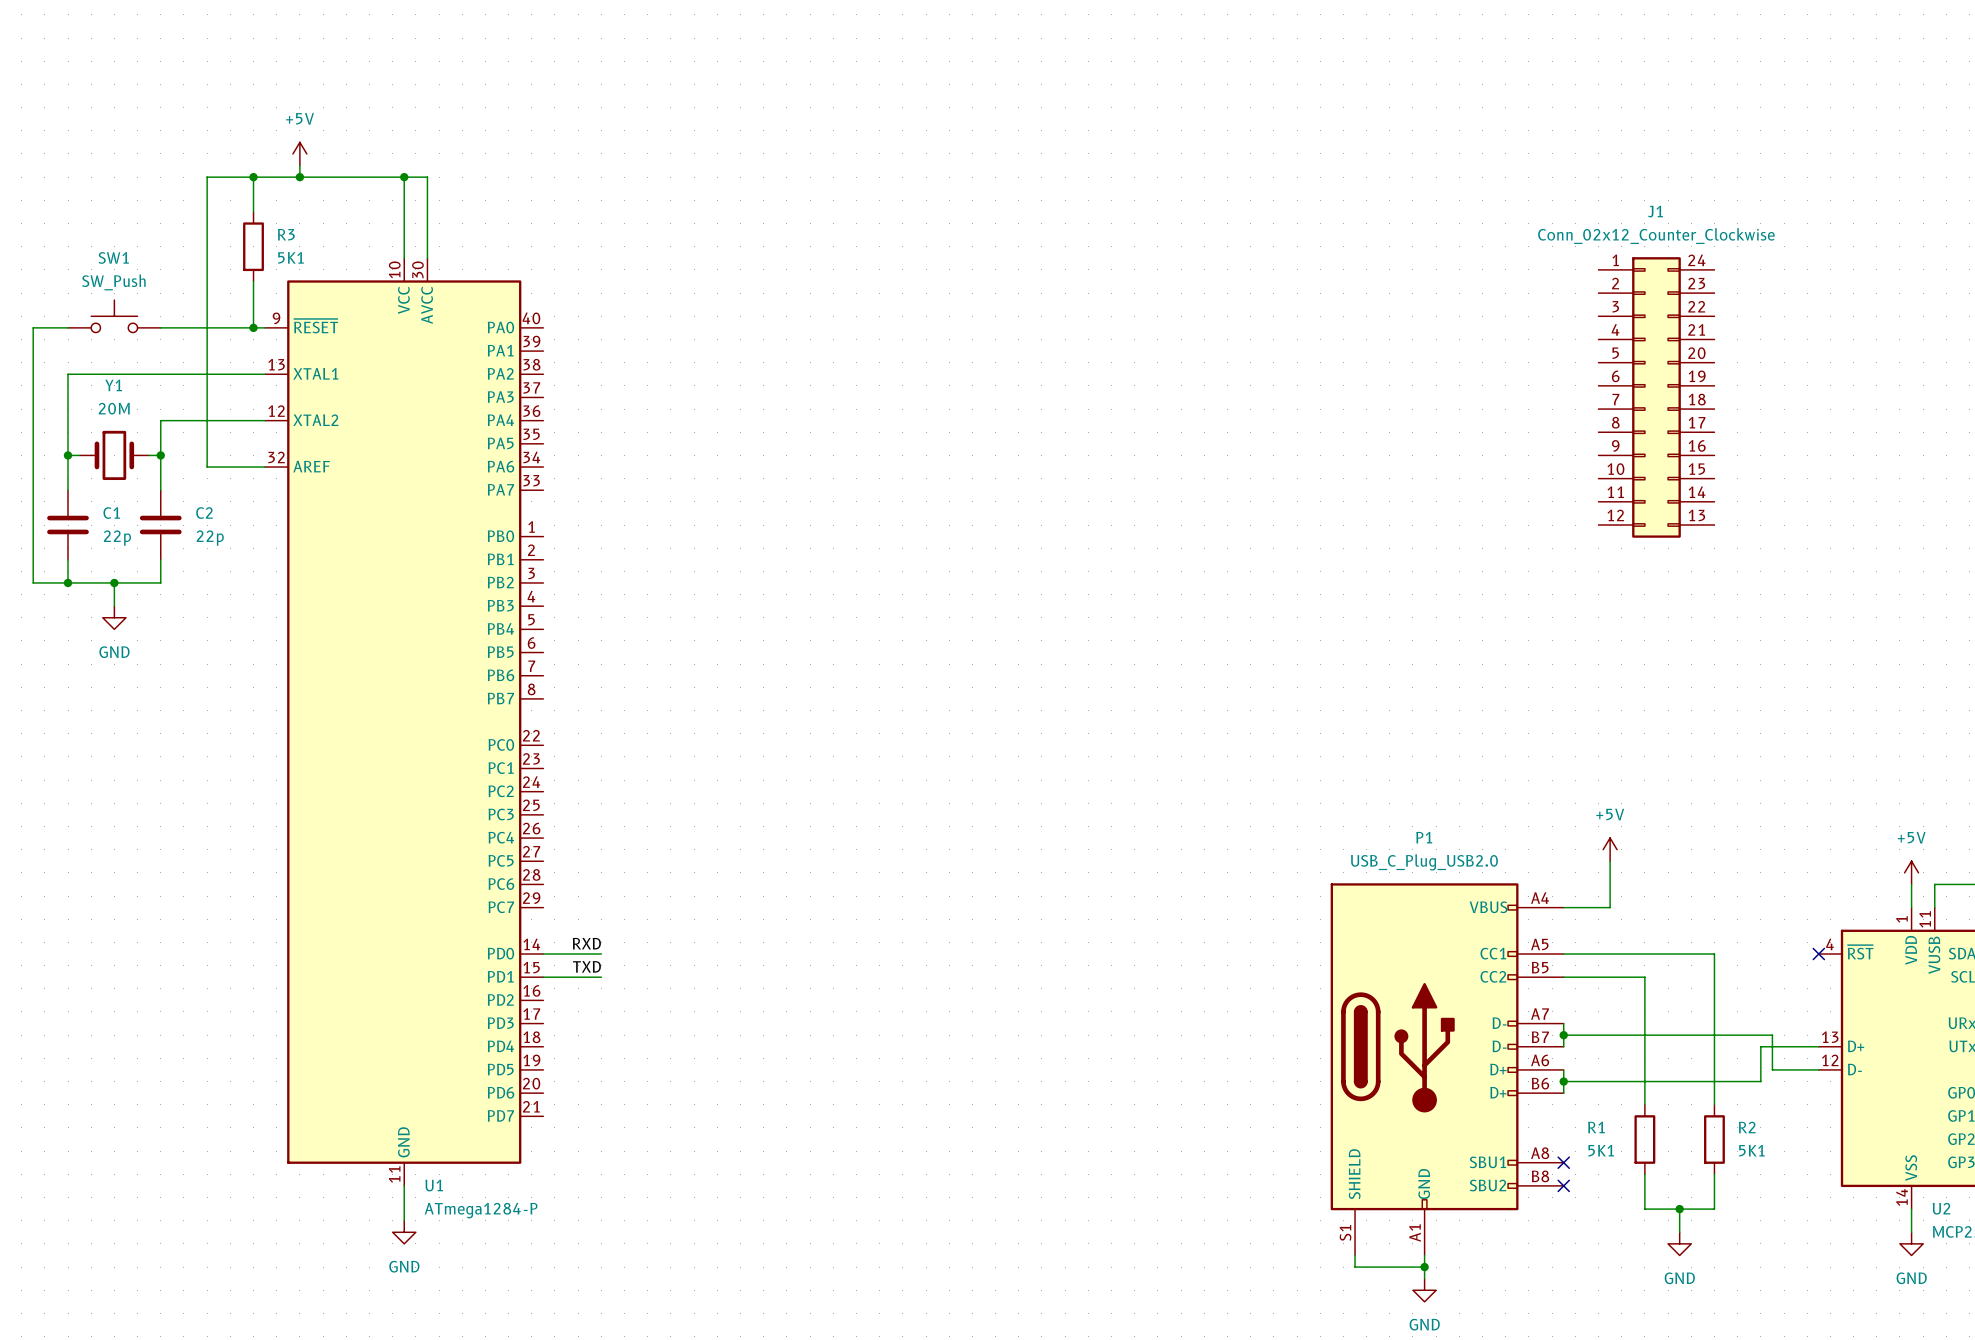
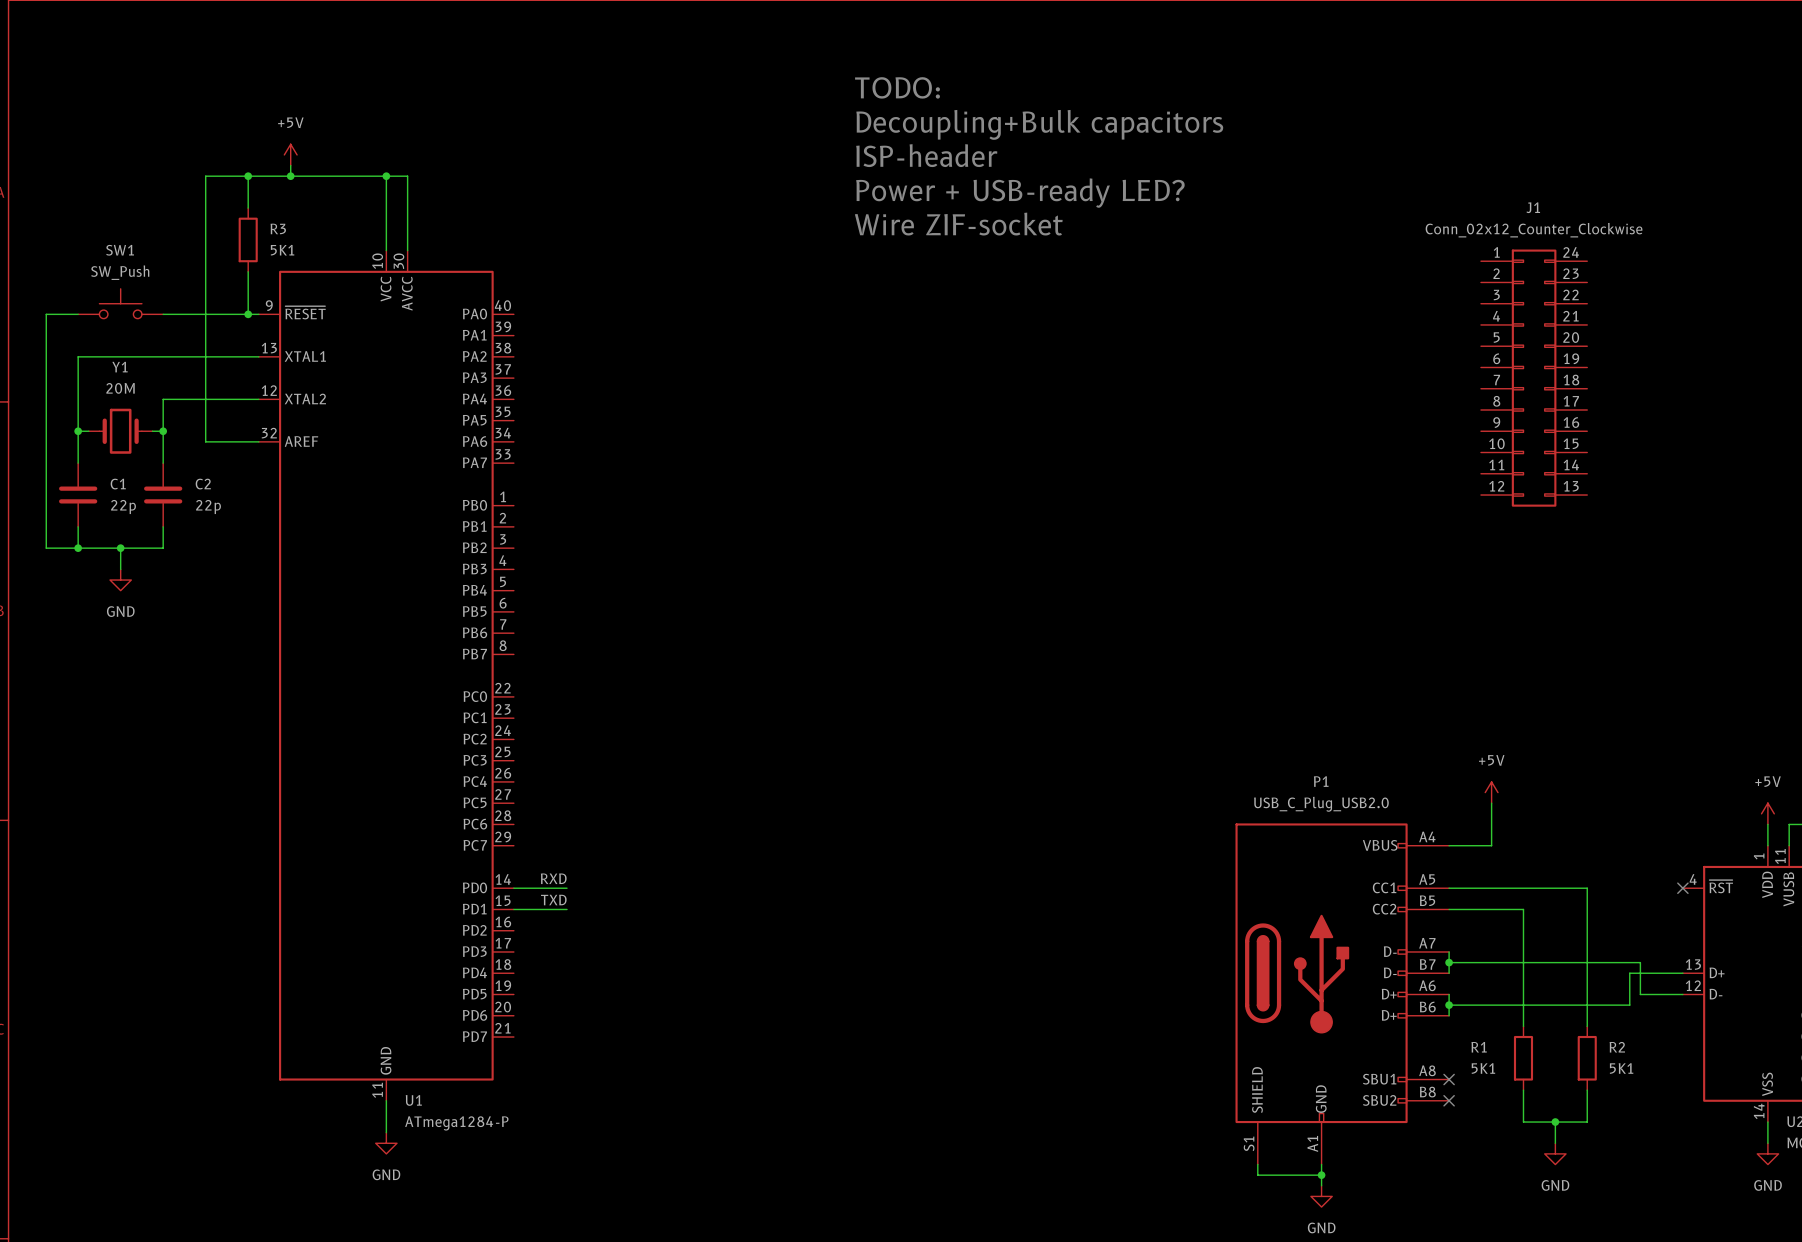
text: none -> TODO: (897, 87)
text: none -> Decoupling+Bulk capacitors (1039, 124)
text: none -> ISP-header (926, 155)
text: none -> Power + USB-ready LED? (1020, 193)
text: none -> Wire ZIF-socket (958, 224)

